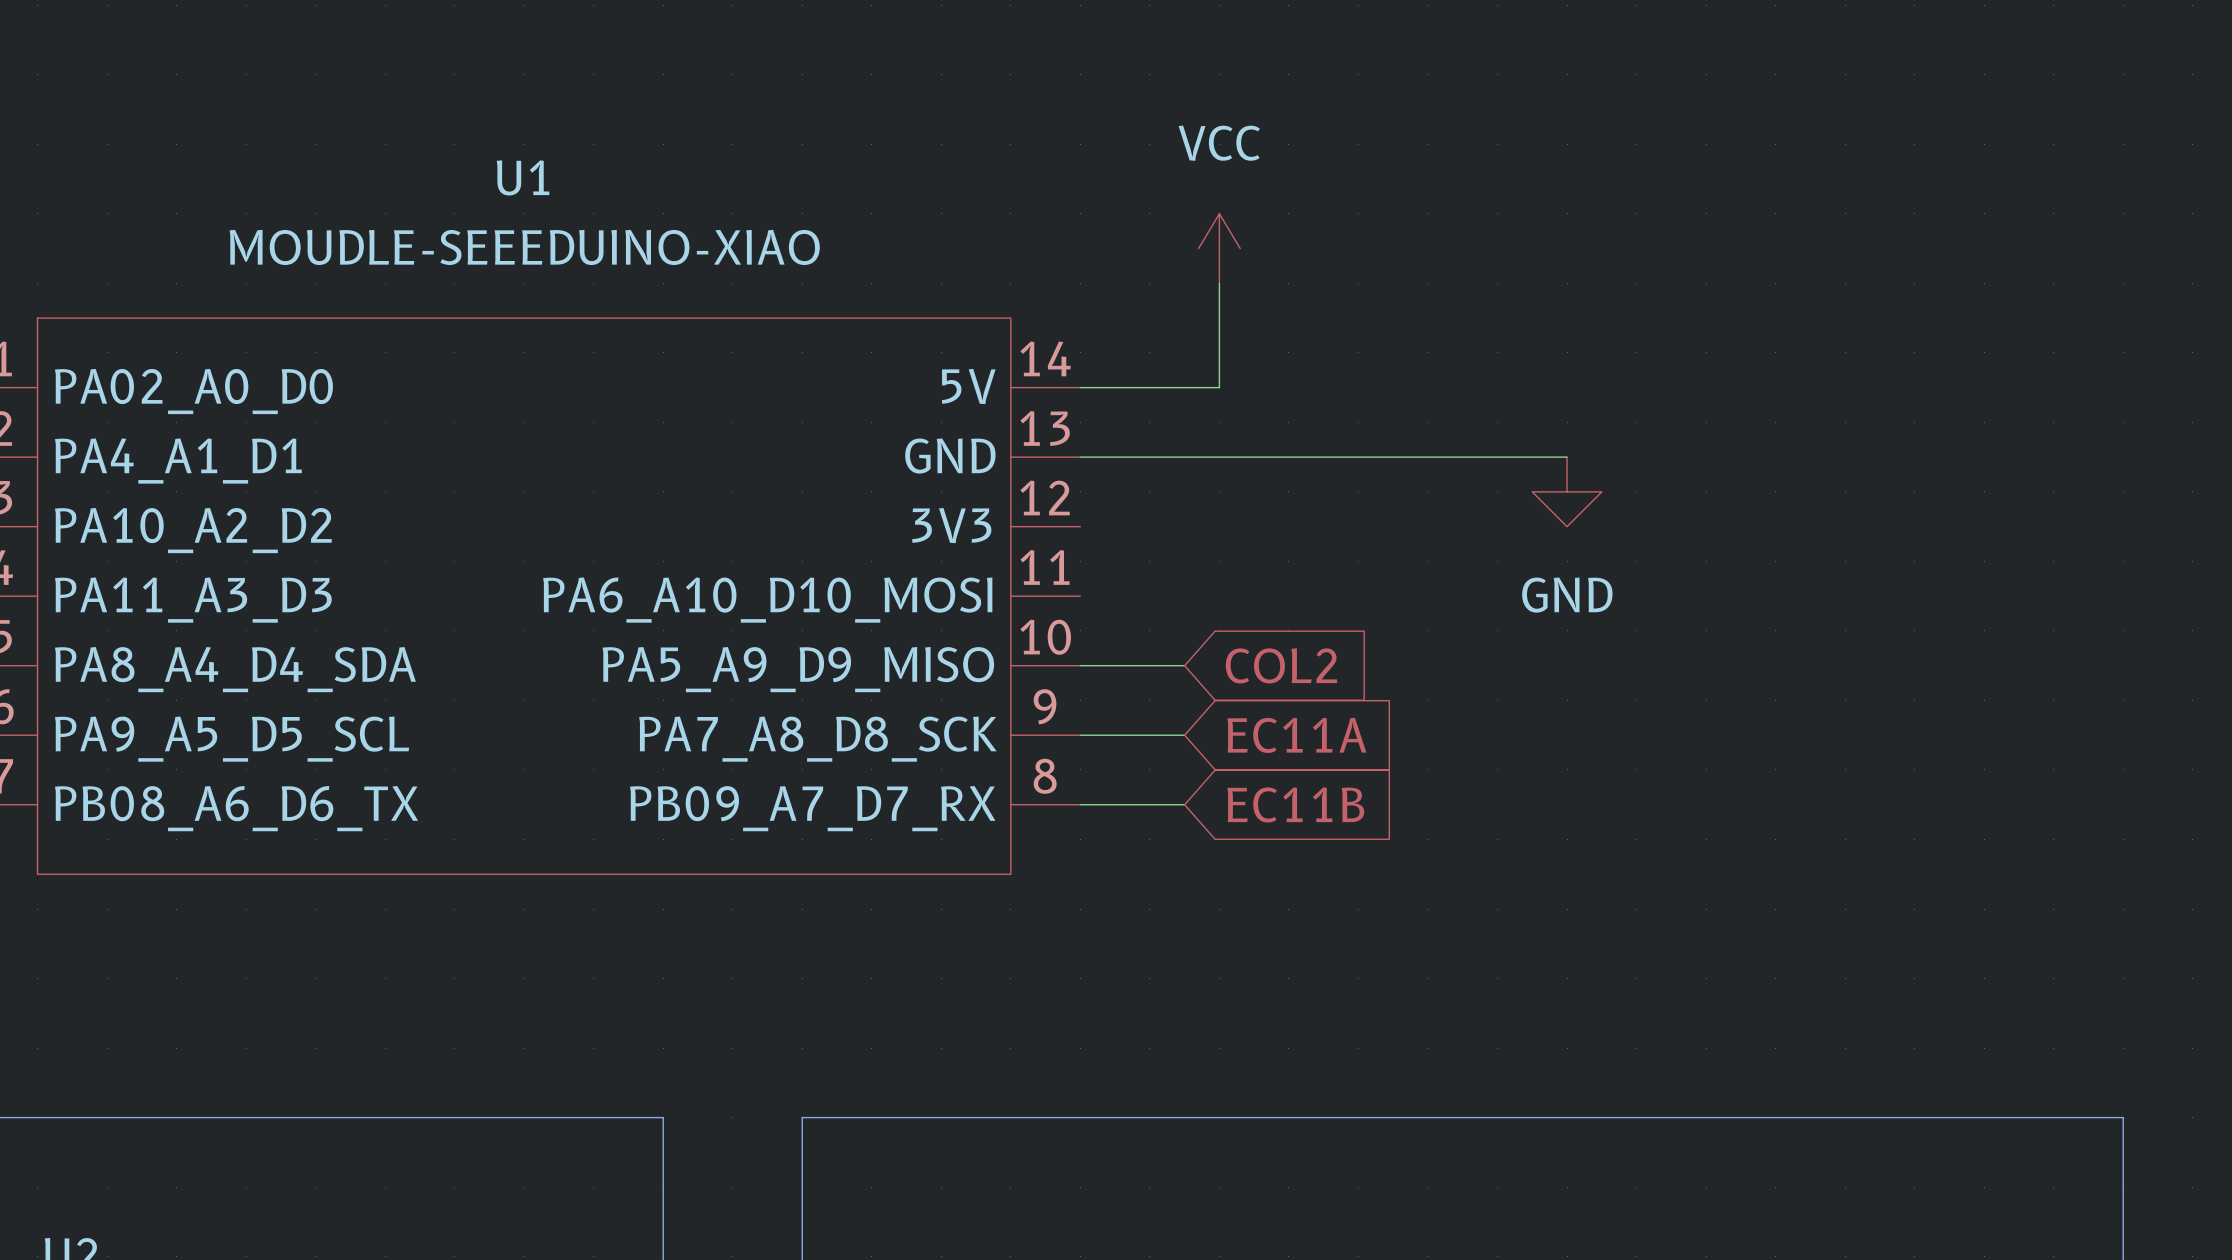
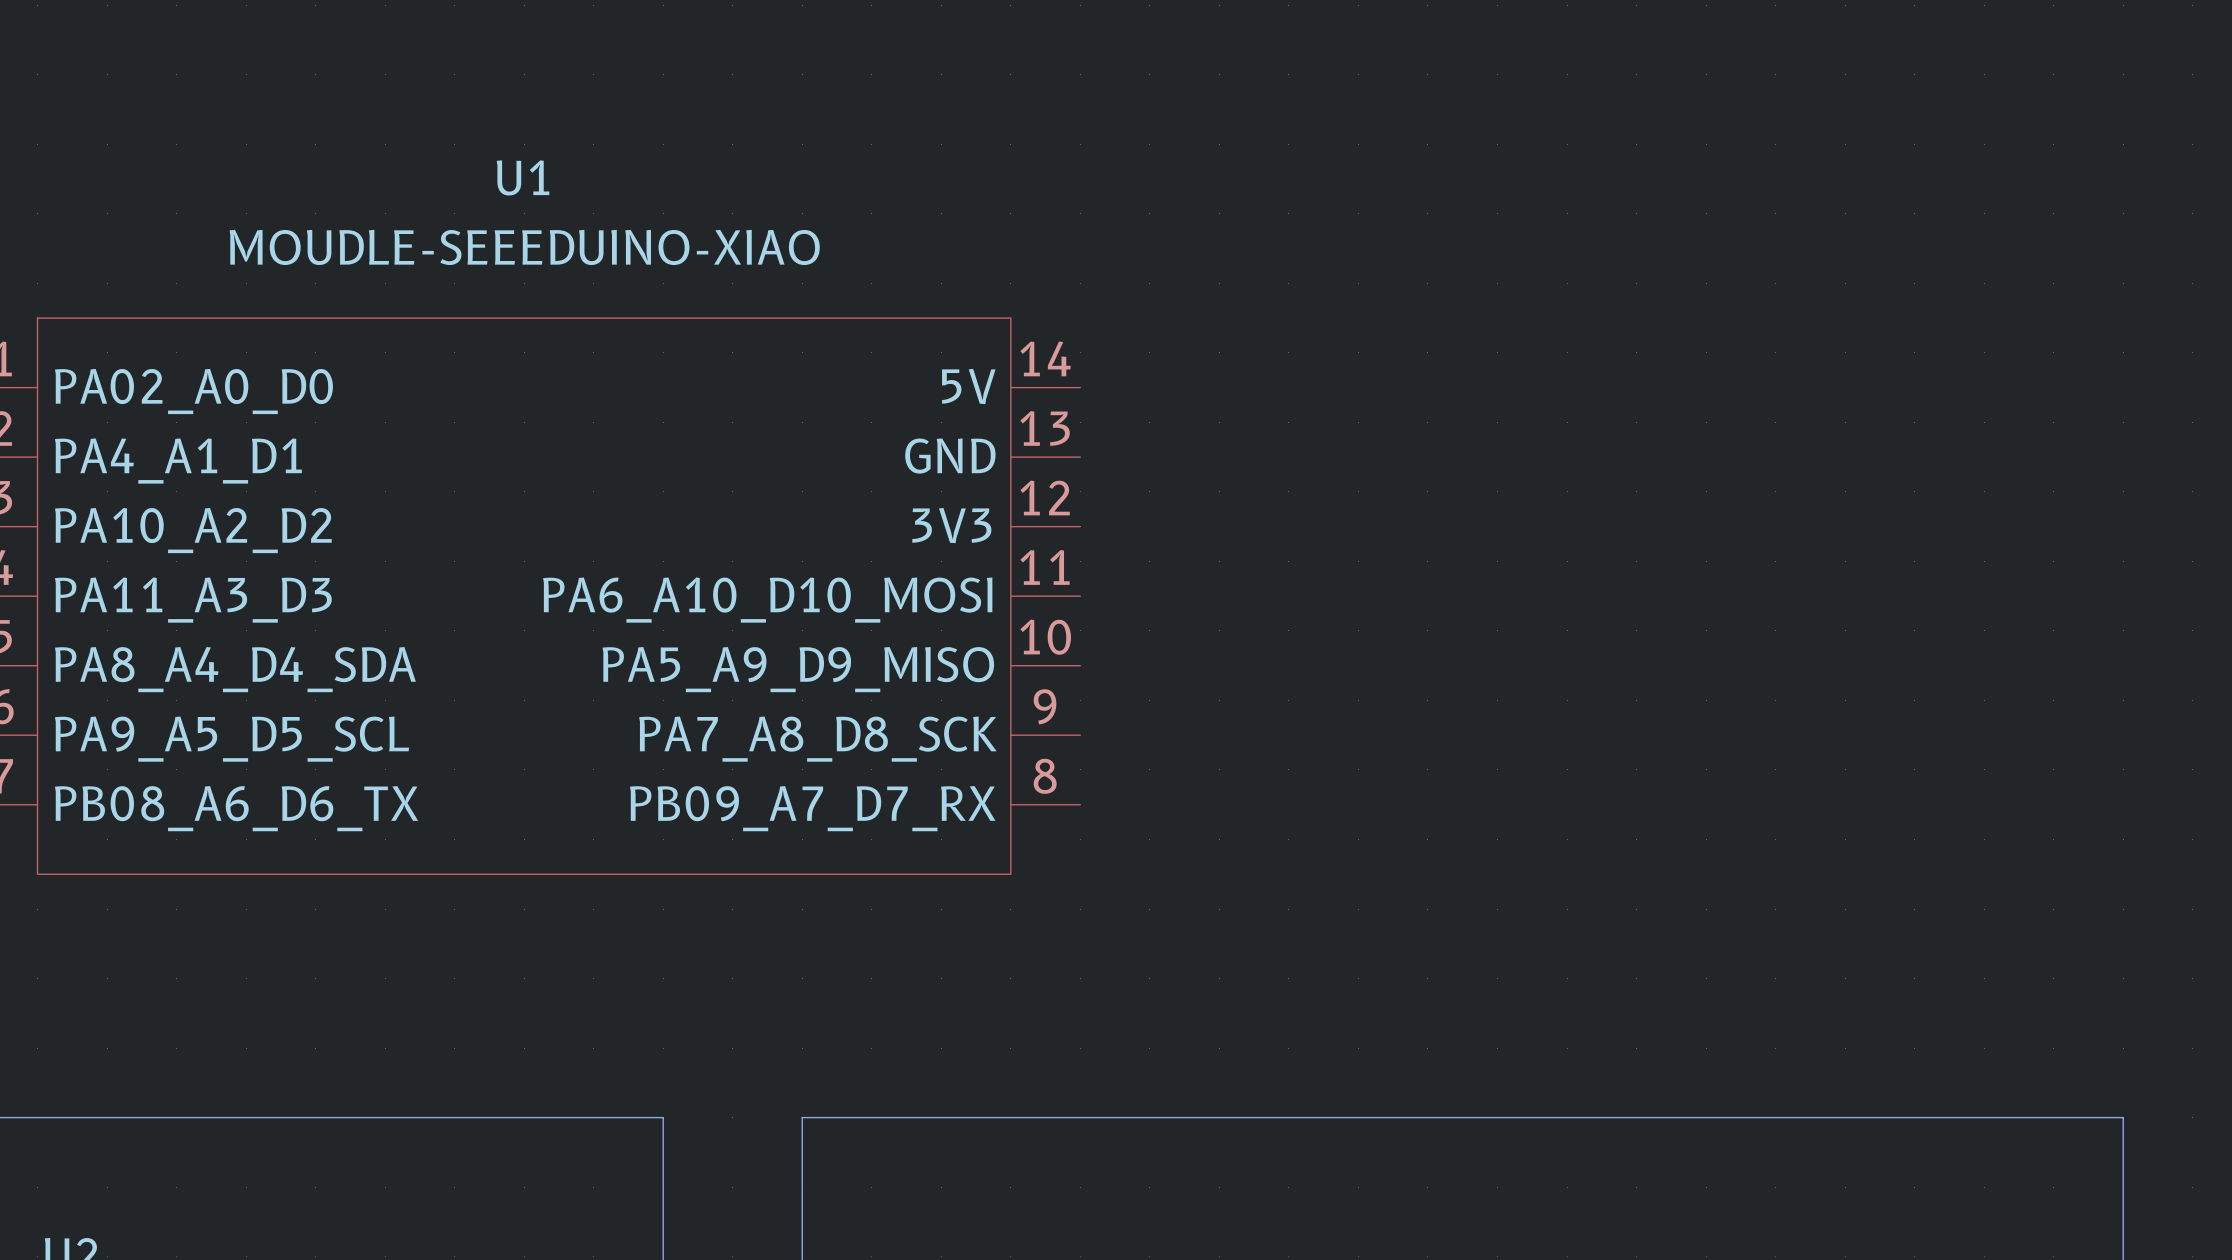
power symbol: VCC (1219, 248) -> none
wire: (1219, 283) (1219, 387) (1080, 387) -> none
wire: (1080, 457) (1567, 457) -> none
power symbol: GND (1567, 491) -> none
wire: (1080, 665) (1184, 665) -> none
global label: COL2 (1281, 665) -> none
wire: (1080, 735) (1184, 735) -> none
global label: EC11A (1296, 735) -> none
wire: (1080, 804) (1184, 804) -> none
global label: EC11B (1295, 804) -> none

